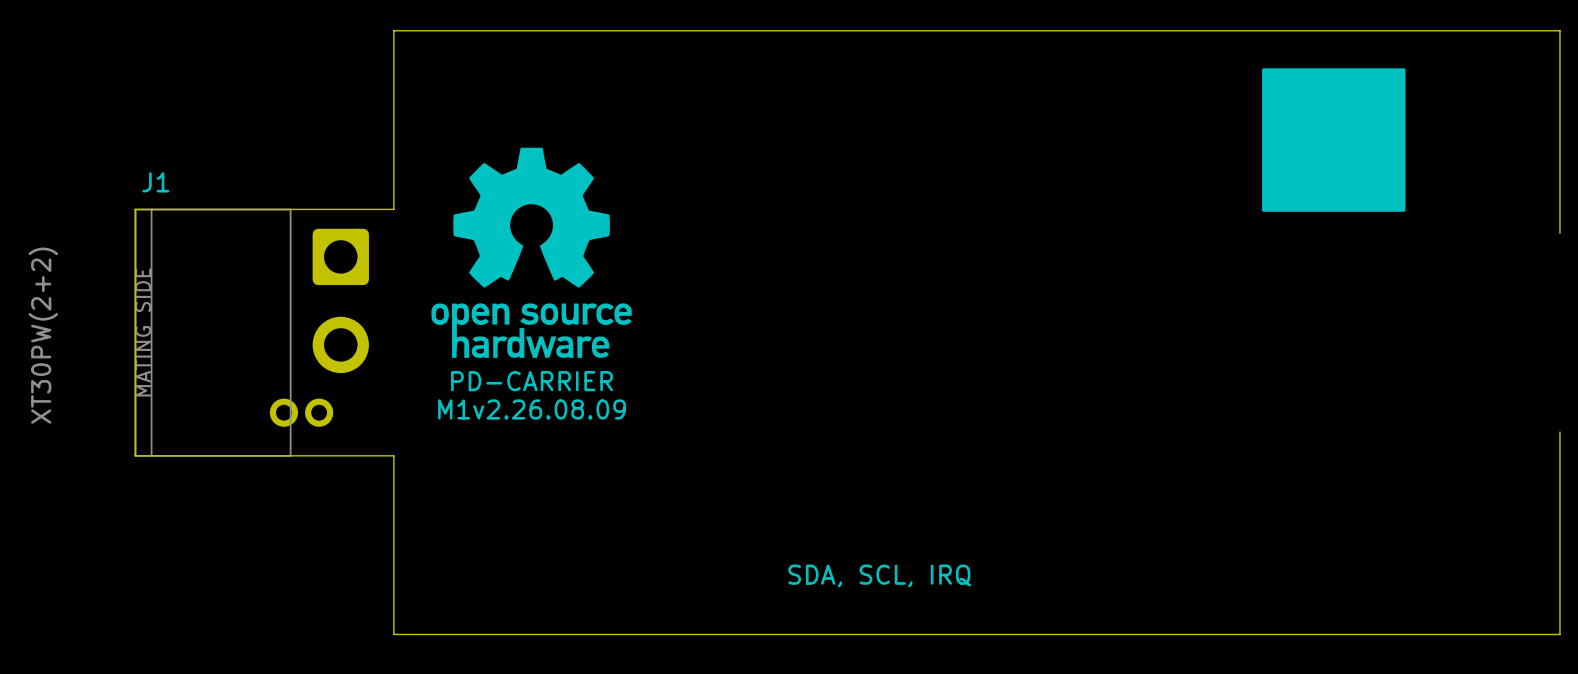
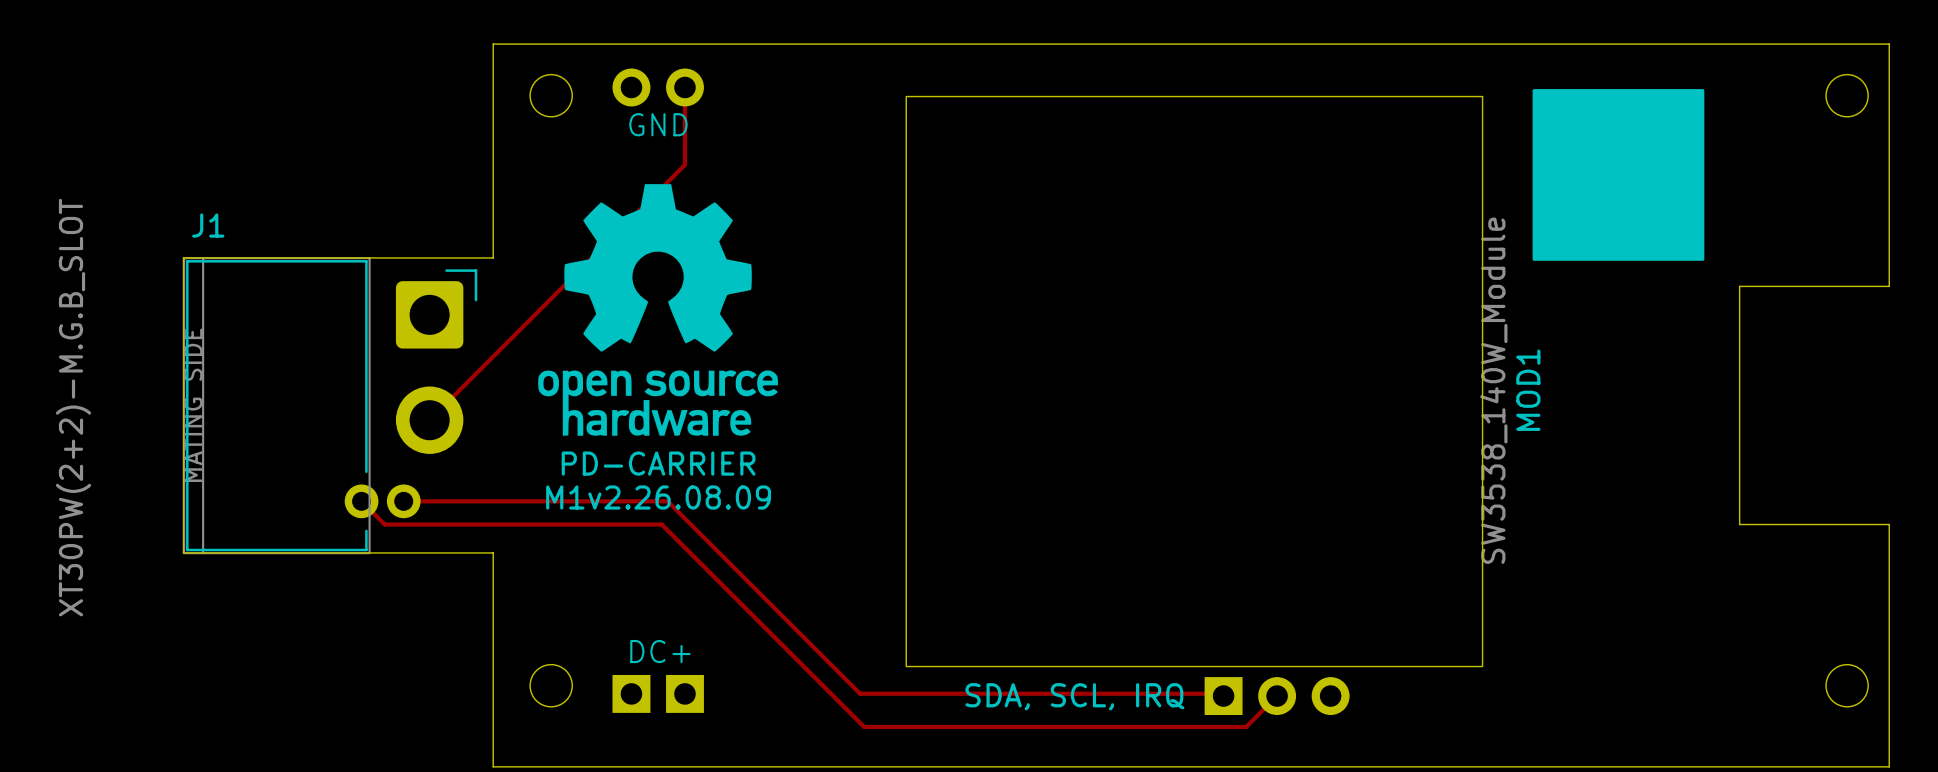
track: none -> (684, 87) (684, 164) (429, 420)
J1 footprint: [134, 208, 369, 457] -> [183, 257, 478, 555]
MOD1: none -> SW3538_140W_Module (1209, 391)
J1 value: XT30PW(2+2) (43, 335) -> XT30PW(2+2)-M.G.B_SLOT (73, 407)
track: none -> (361, 501) (384, 524) (661, 524) (864, 727) (1246, 727) (1277, 696)
track: none -> (403, 501) (667, 501) (860, 693) (1221, 693) (1223, 696)

